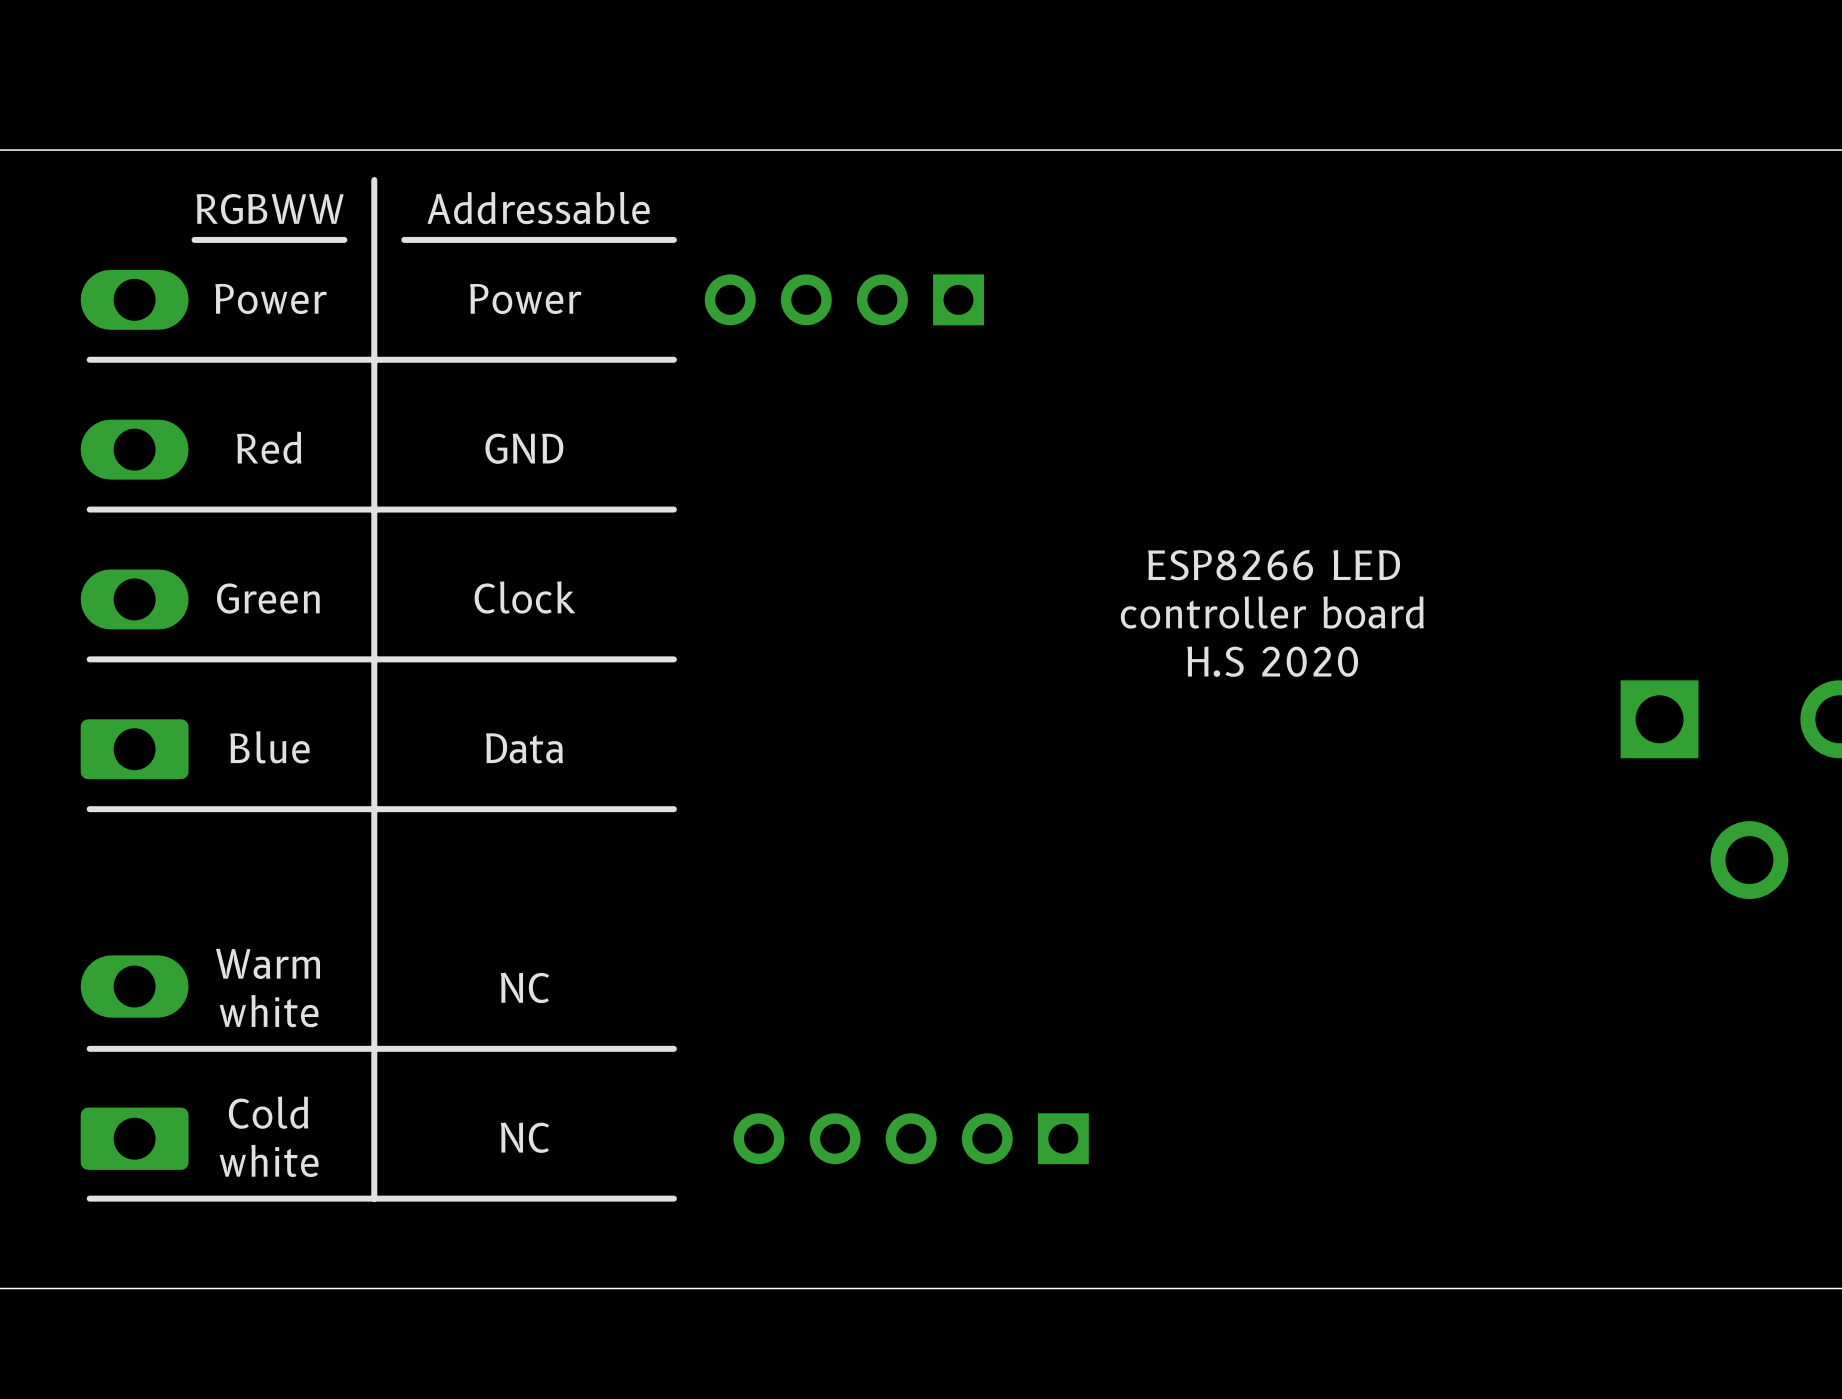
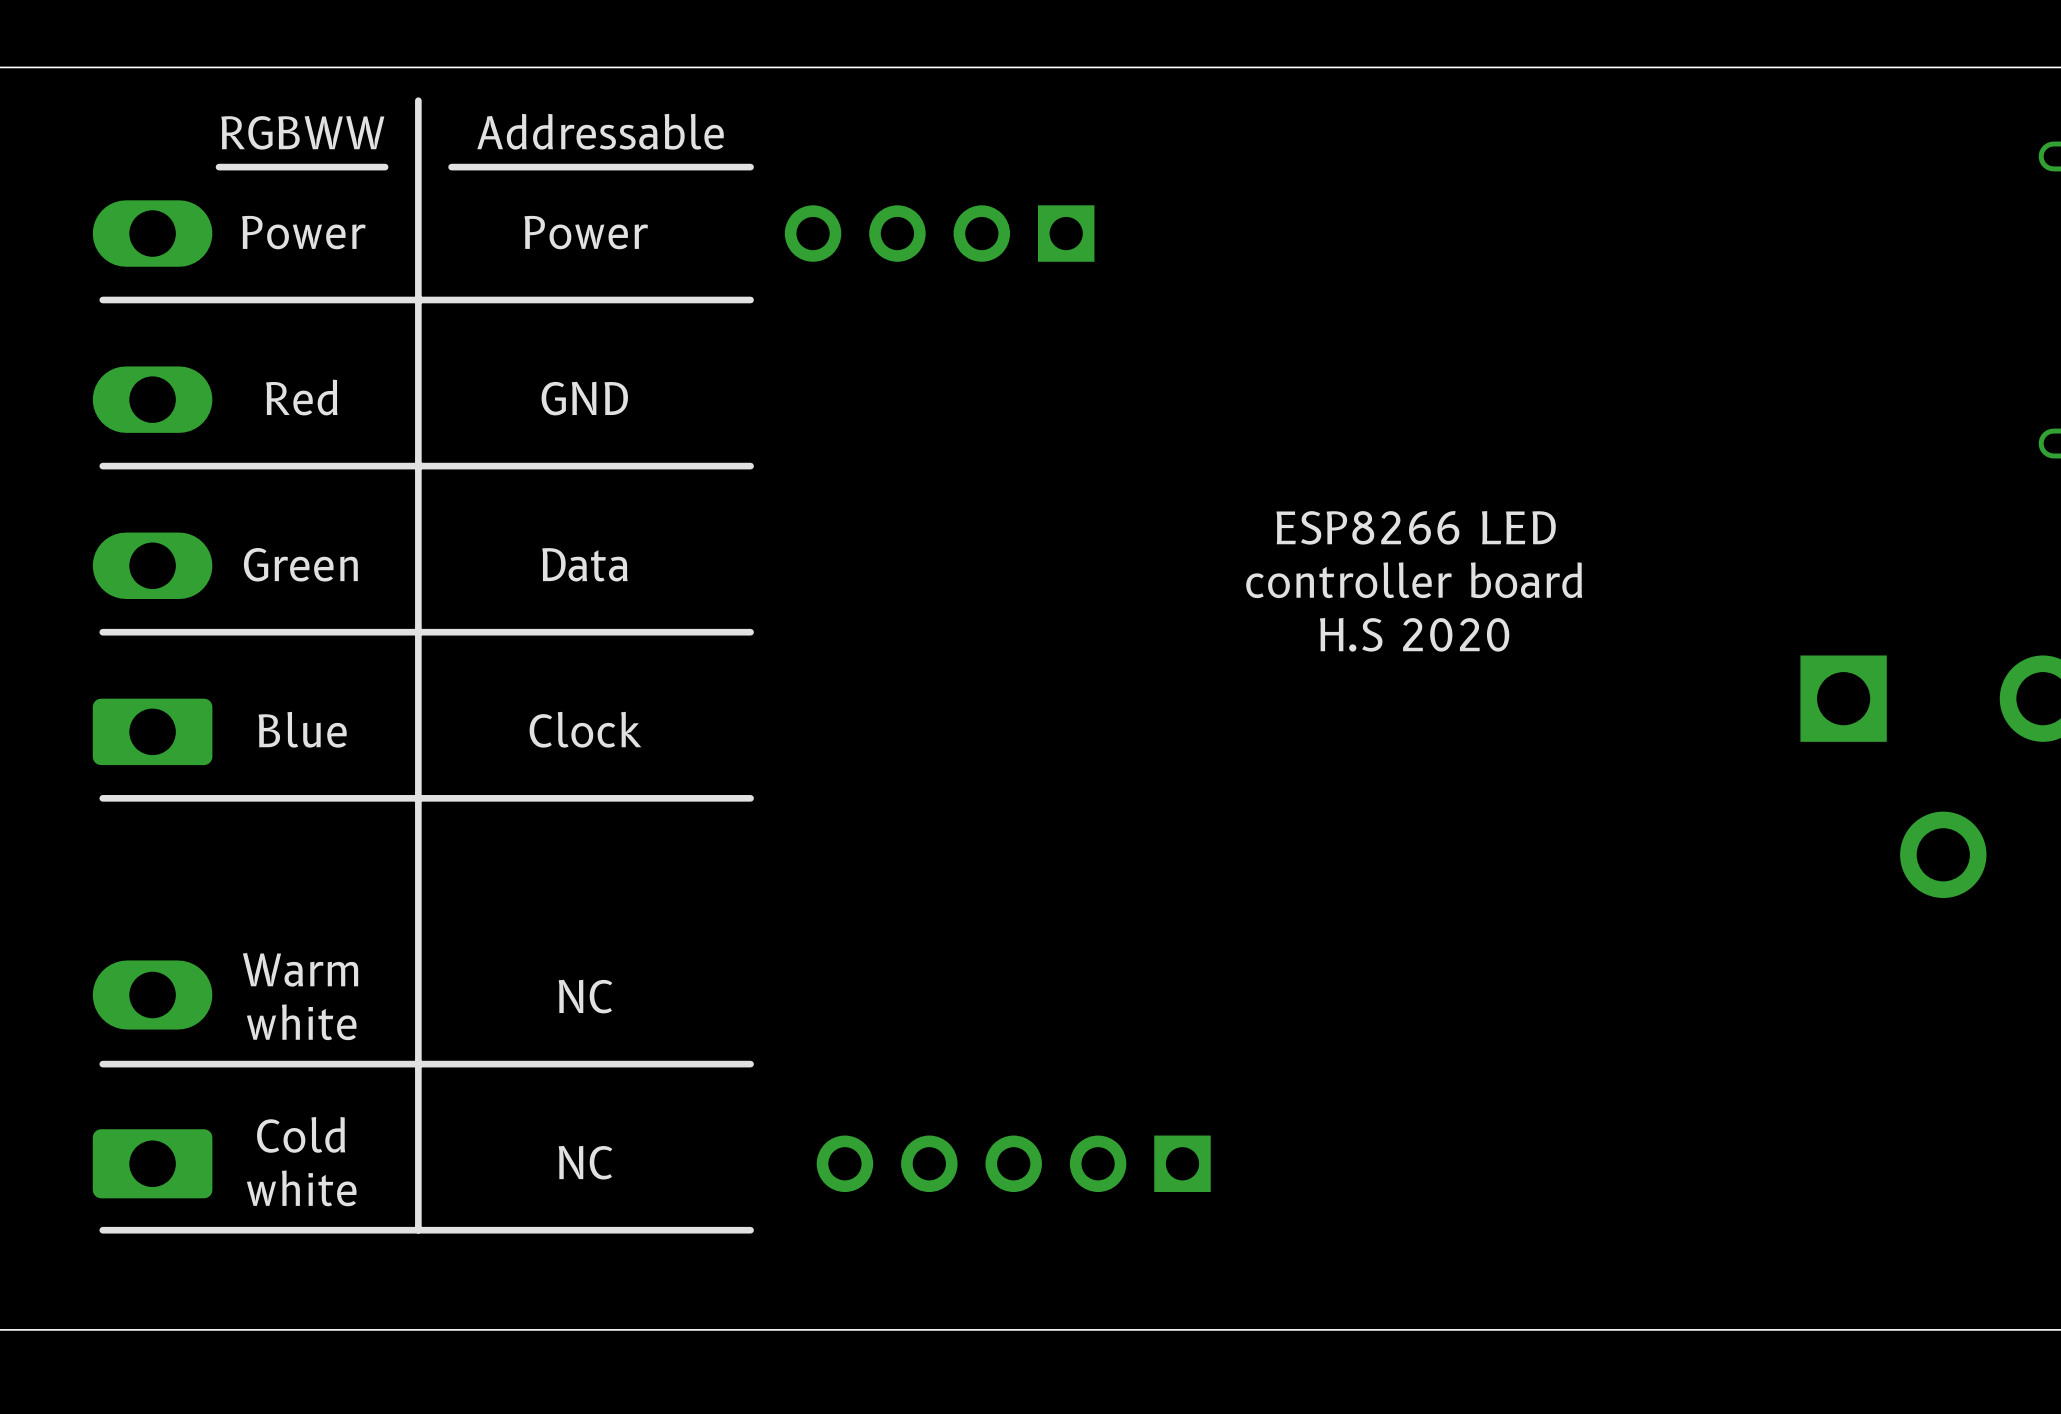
text: Clock (524, 597) -> Data (584, 564)
text: Data (524, 748) -> Clock (585, 729)

